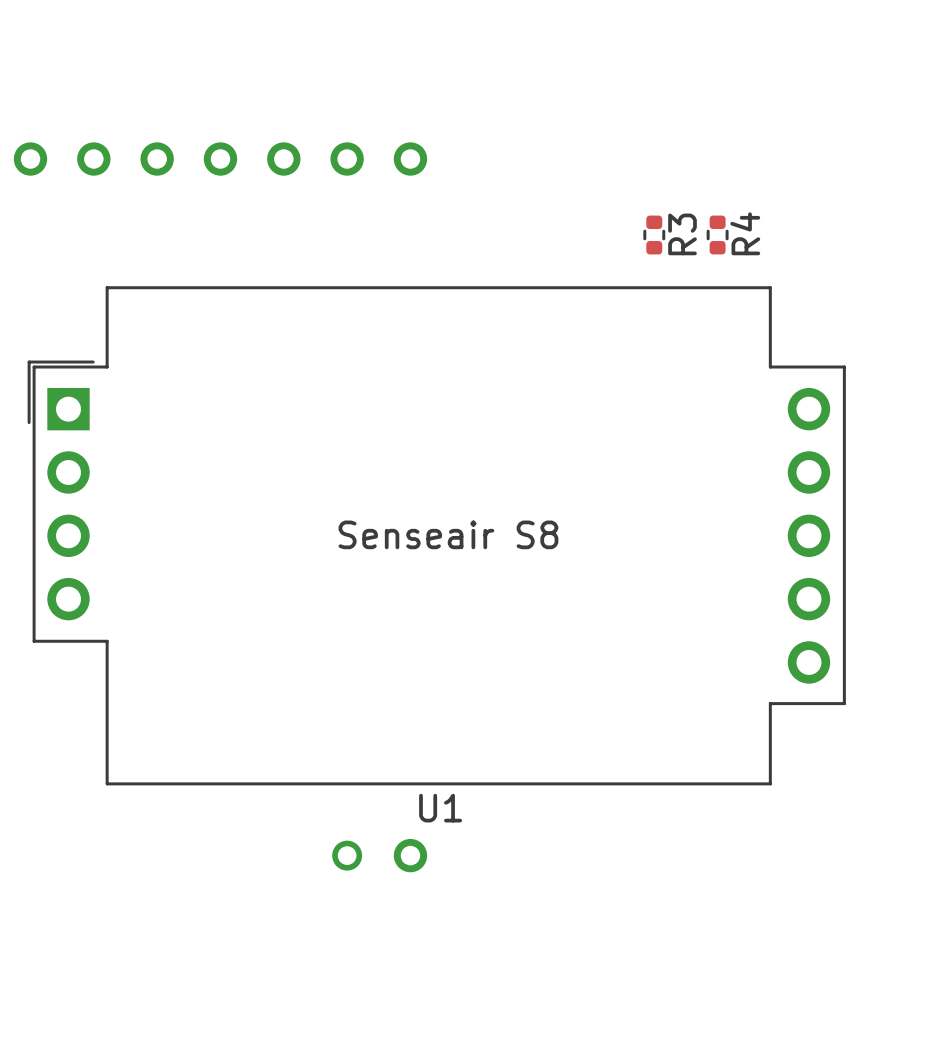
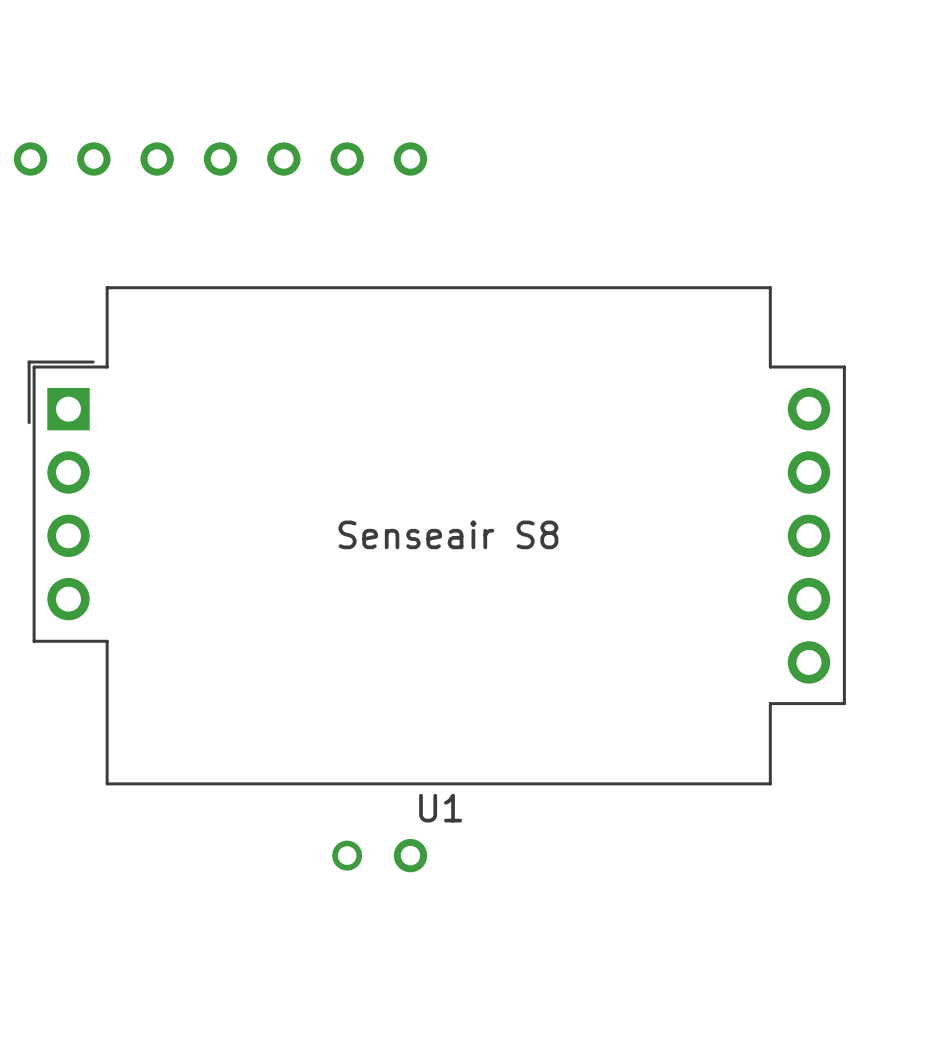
R3: (654, 235) -> none
R4: (717, 235) -> none

